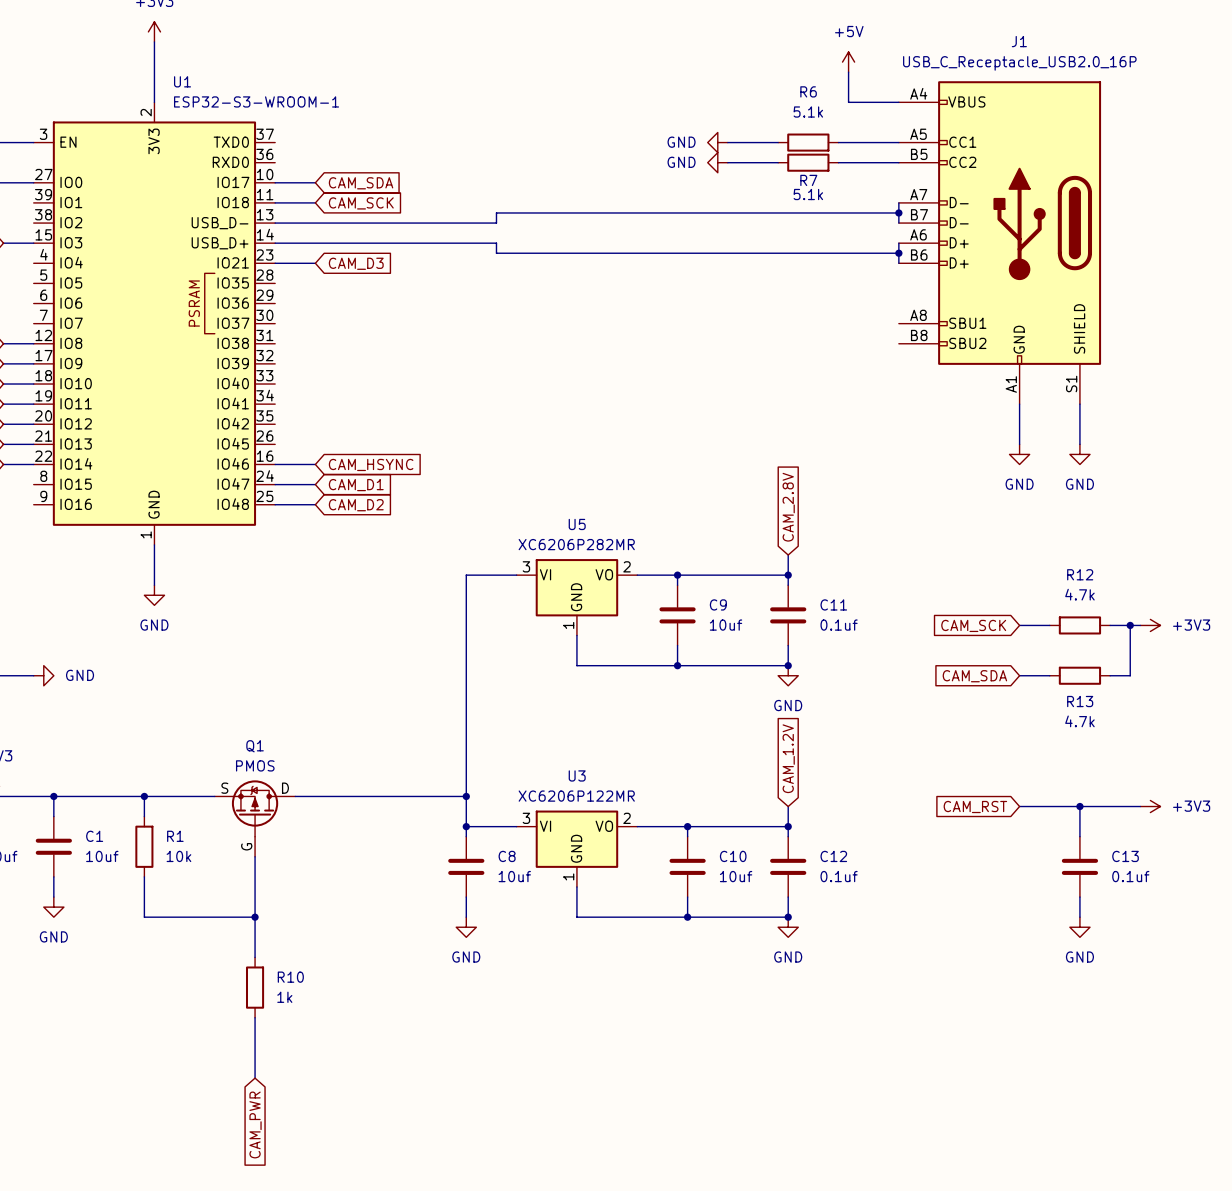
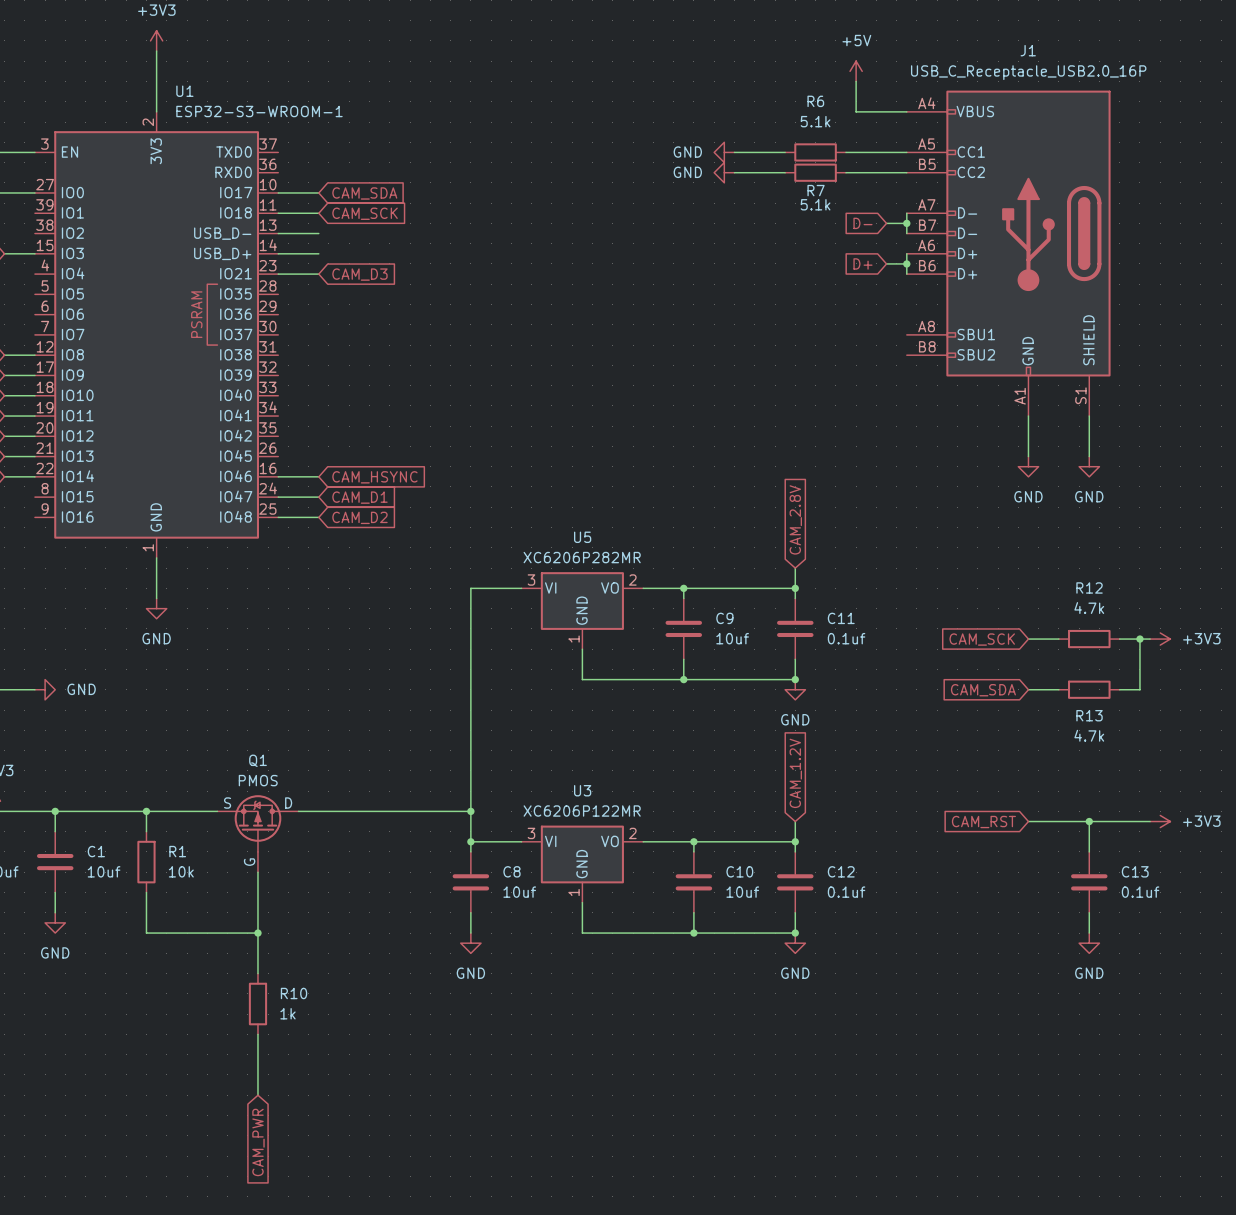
global label: none -> D- (862, 223)
wire: (878, 212) (496, 212) (496, 223) (315, 223) -> none
wire: (315, 243) (496, 243) (496, 253) (878, 253) -> none
global label: none -> D+ (862, 263)

